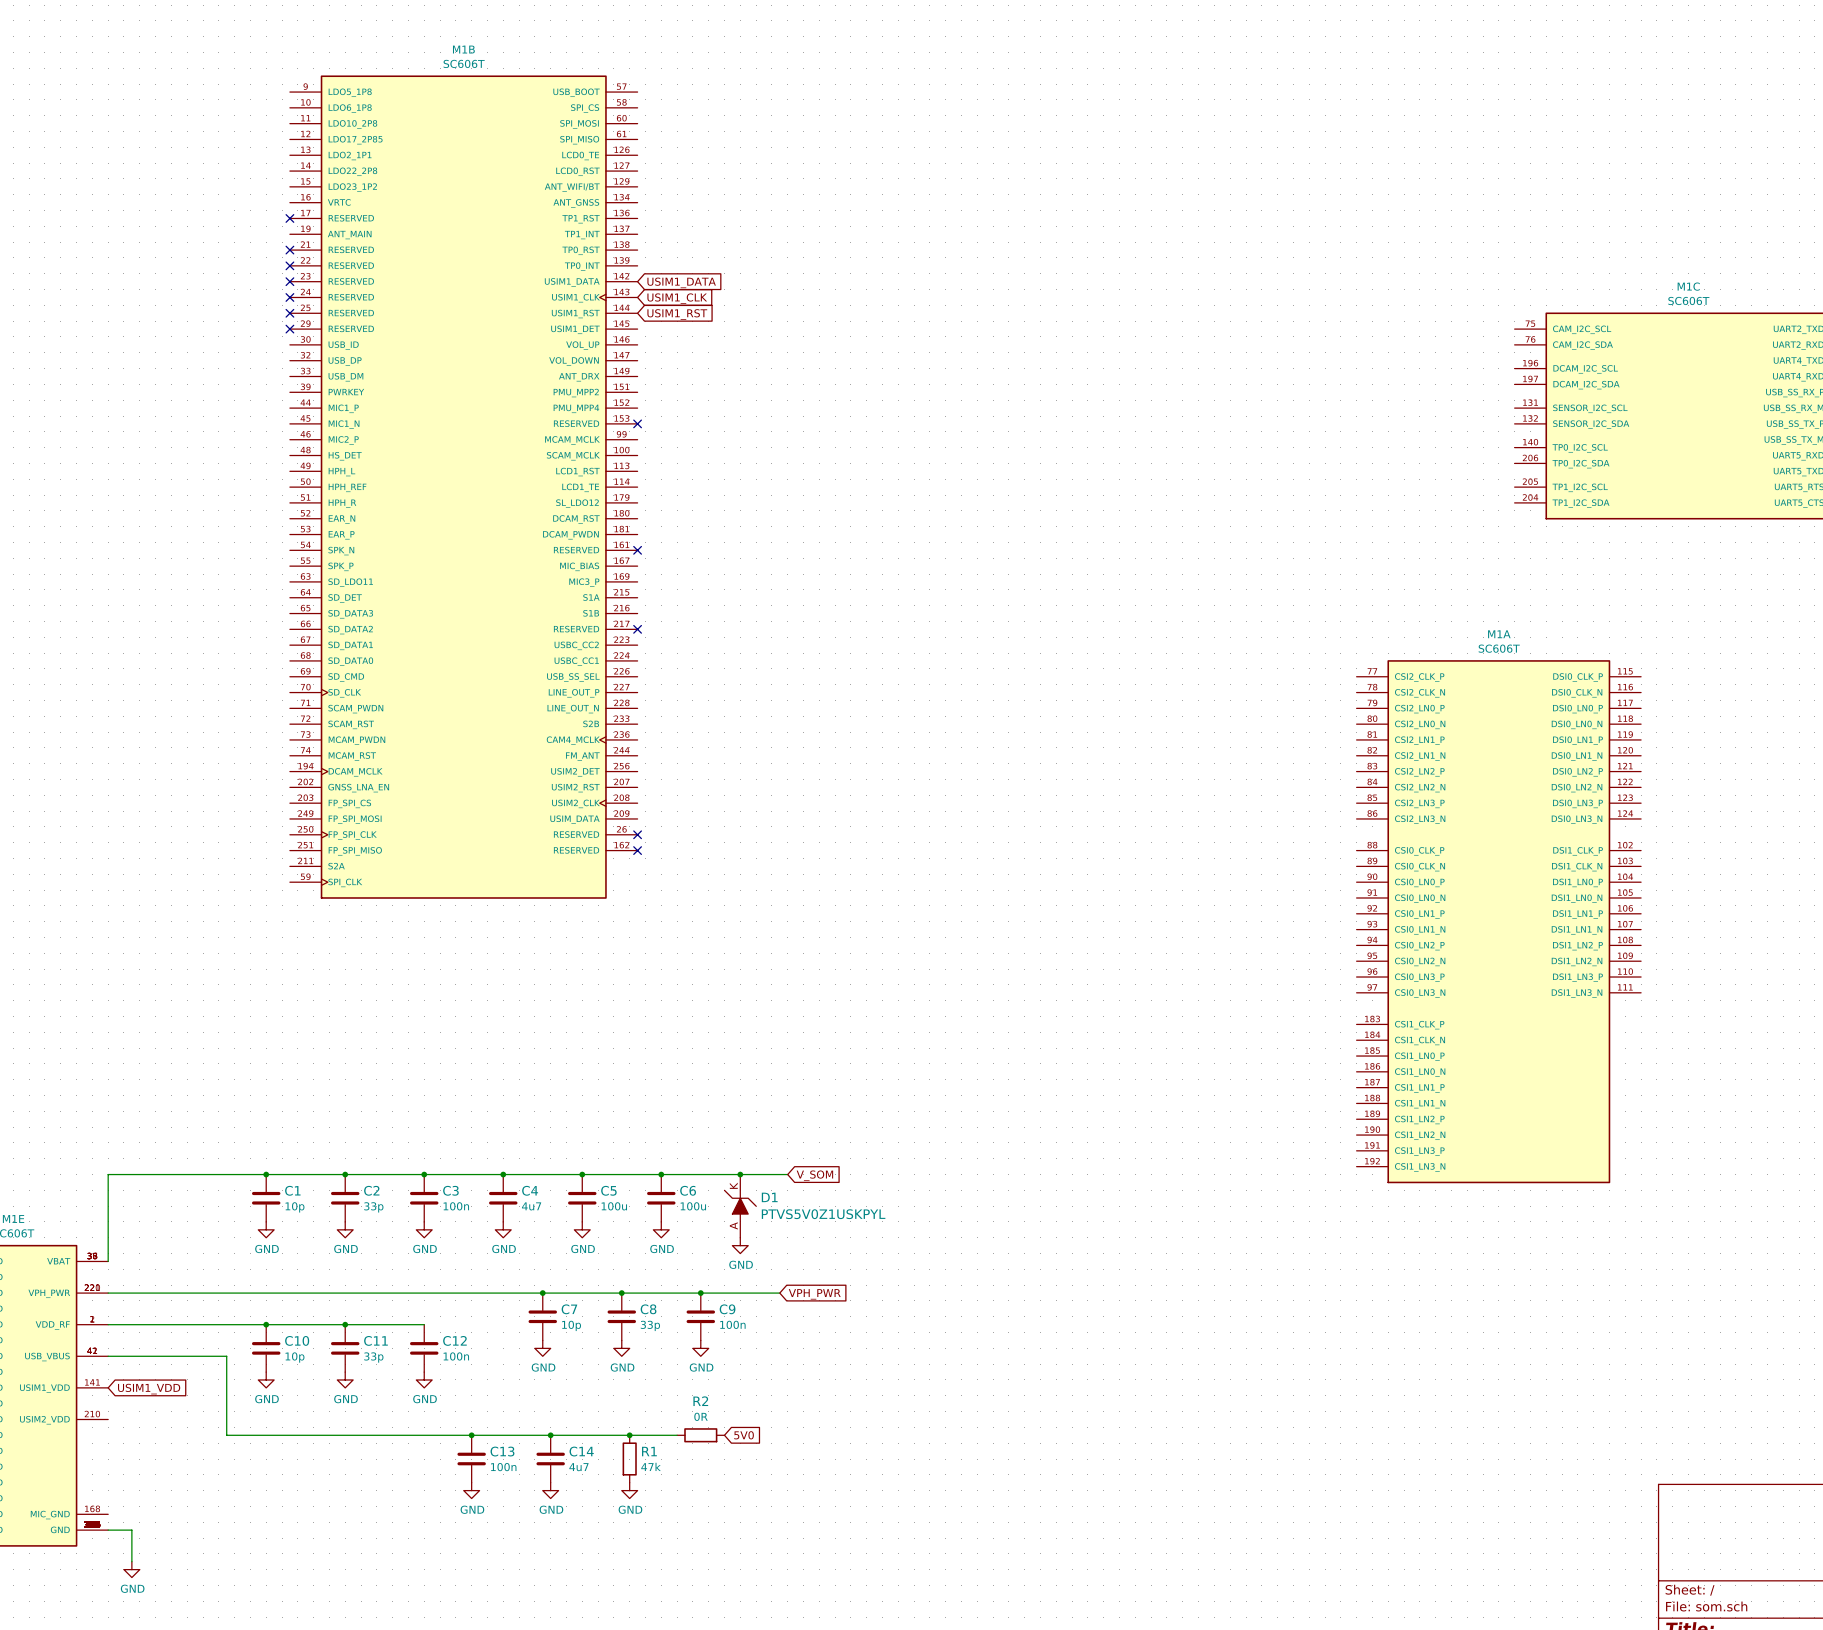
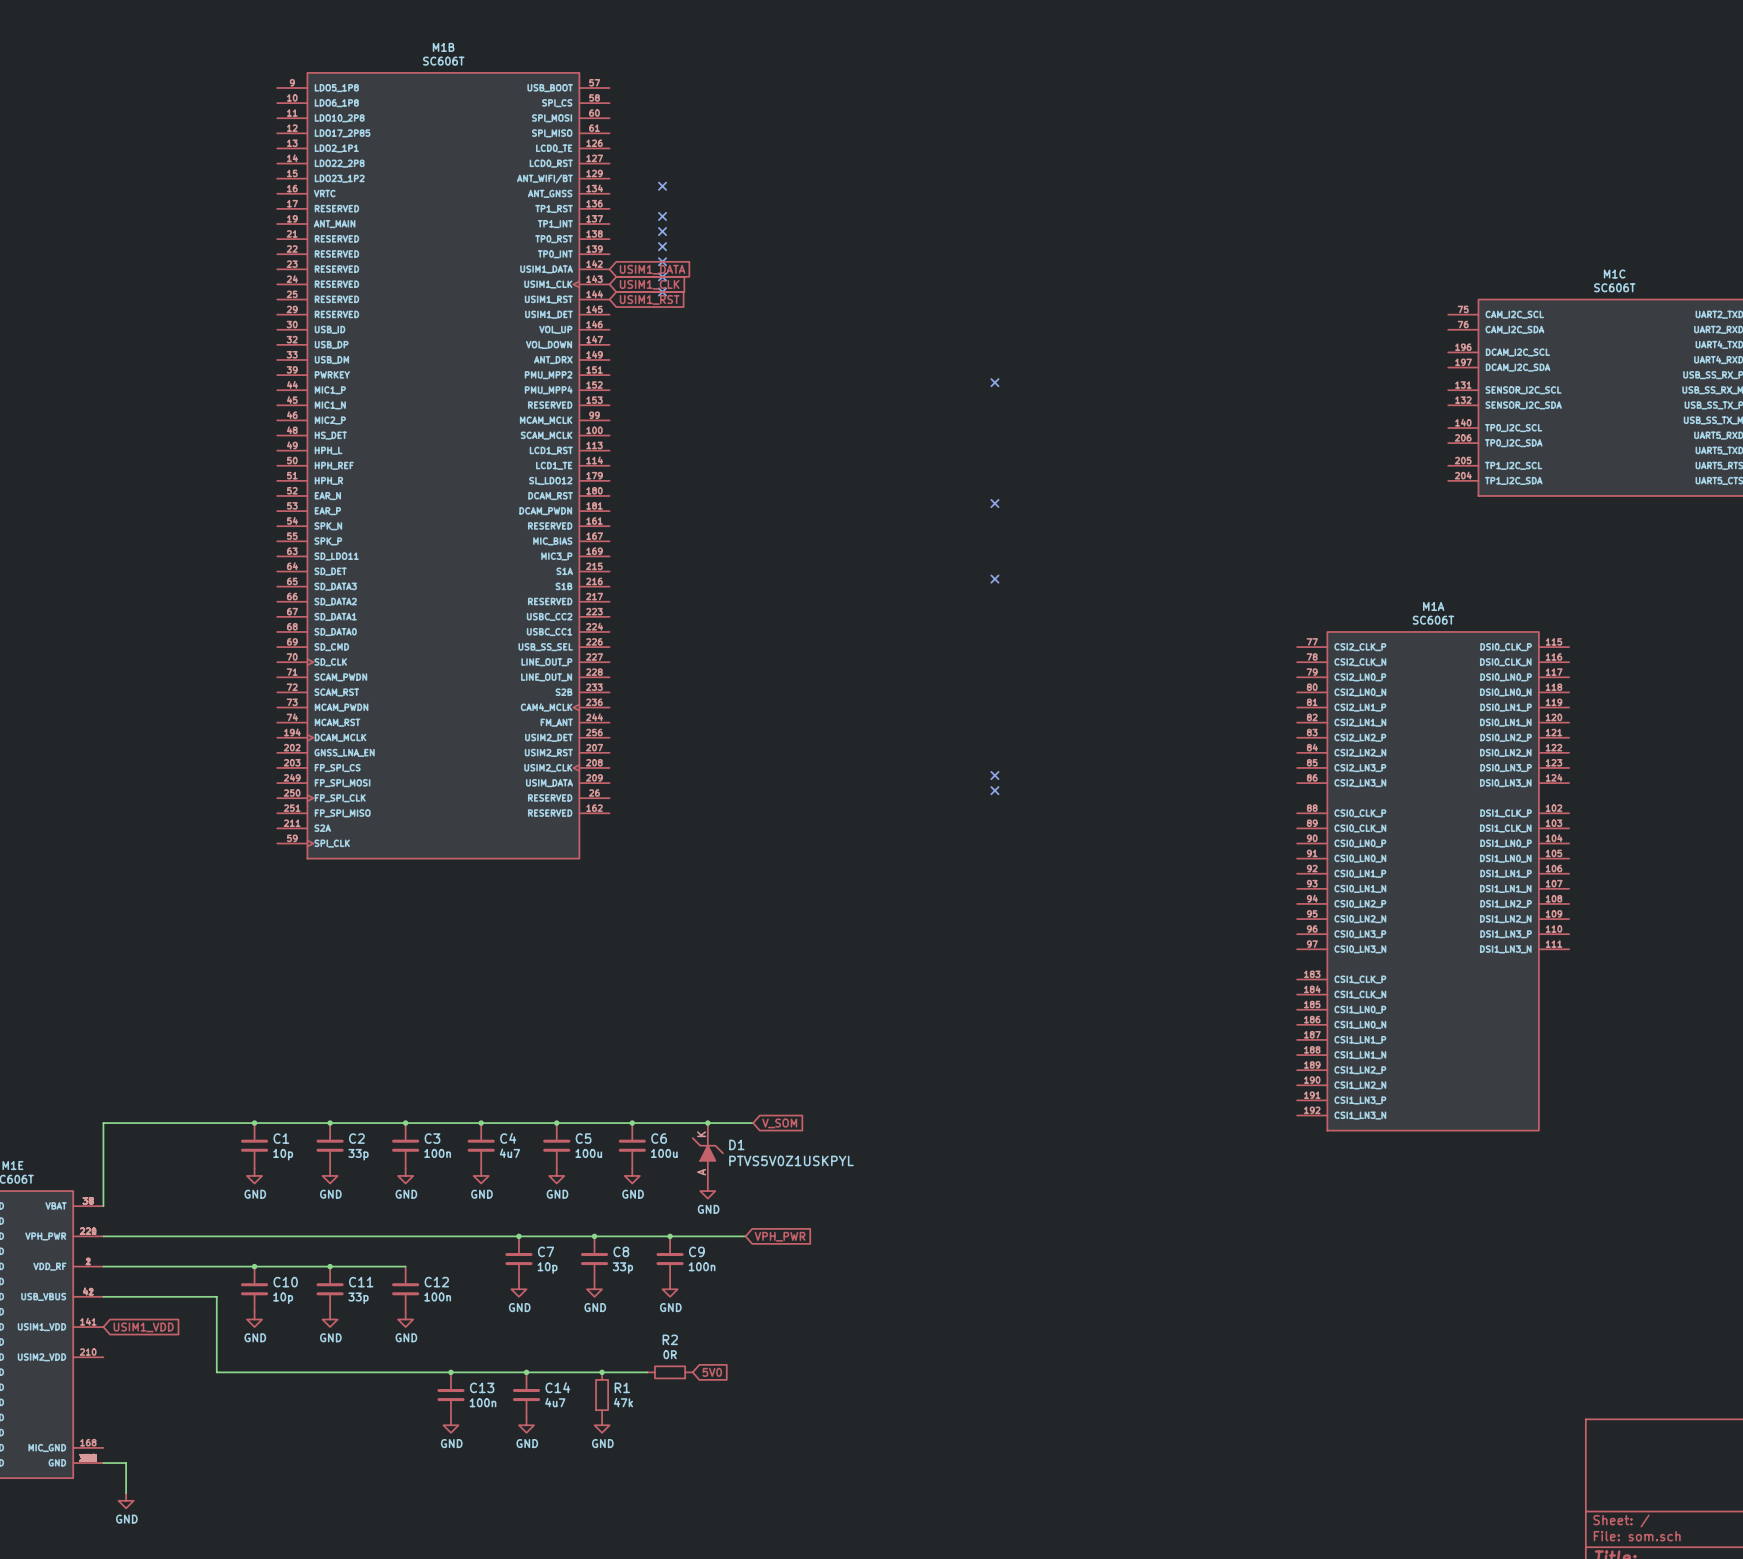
no-connect mark: none -> (662, 186)
no-connect mark: (289, 218) -> none
no-connect mark: none -> (662, 216)
no-connect mark: none -> (662, 231)
no-connect mark: (289, 250) -> none
no-connect mark: none -> (662, 246)
no-connect mark: (289, 265) -> none
no-connect mark: none -> (662, 261)
no-connect mark: (289, 281) -> none
no-connect mark: none -> (662, 276)
no-connect mark: (289, 297) -> none
no-connect mark: none -> (662, 291)
no-connect mark: (289, 313) -> none
no-connect mark: (289, 329) -> none
no-connect mark: none -> (994, 382)
no-connect mark: (637, 423) -> none
no-connect mark: none -> (994, 503)
no-connect mark: (637, 550) -> none
no-connect mark: none -> (994, 579)
no-connect mark: (637, 629) -> none
no-connect mark: none -> (994, 775)
no-connect mark: none -> (994, 790)
no-connect mark: (637, 834) -> none
no-connect mark: (637, 850) -> none

